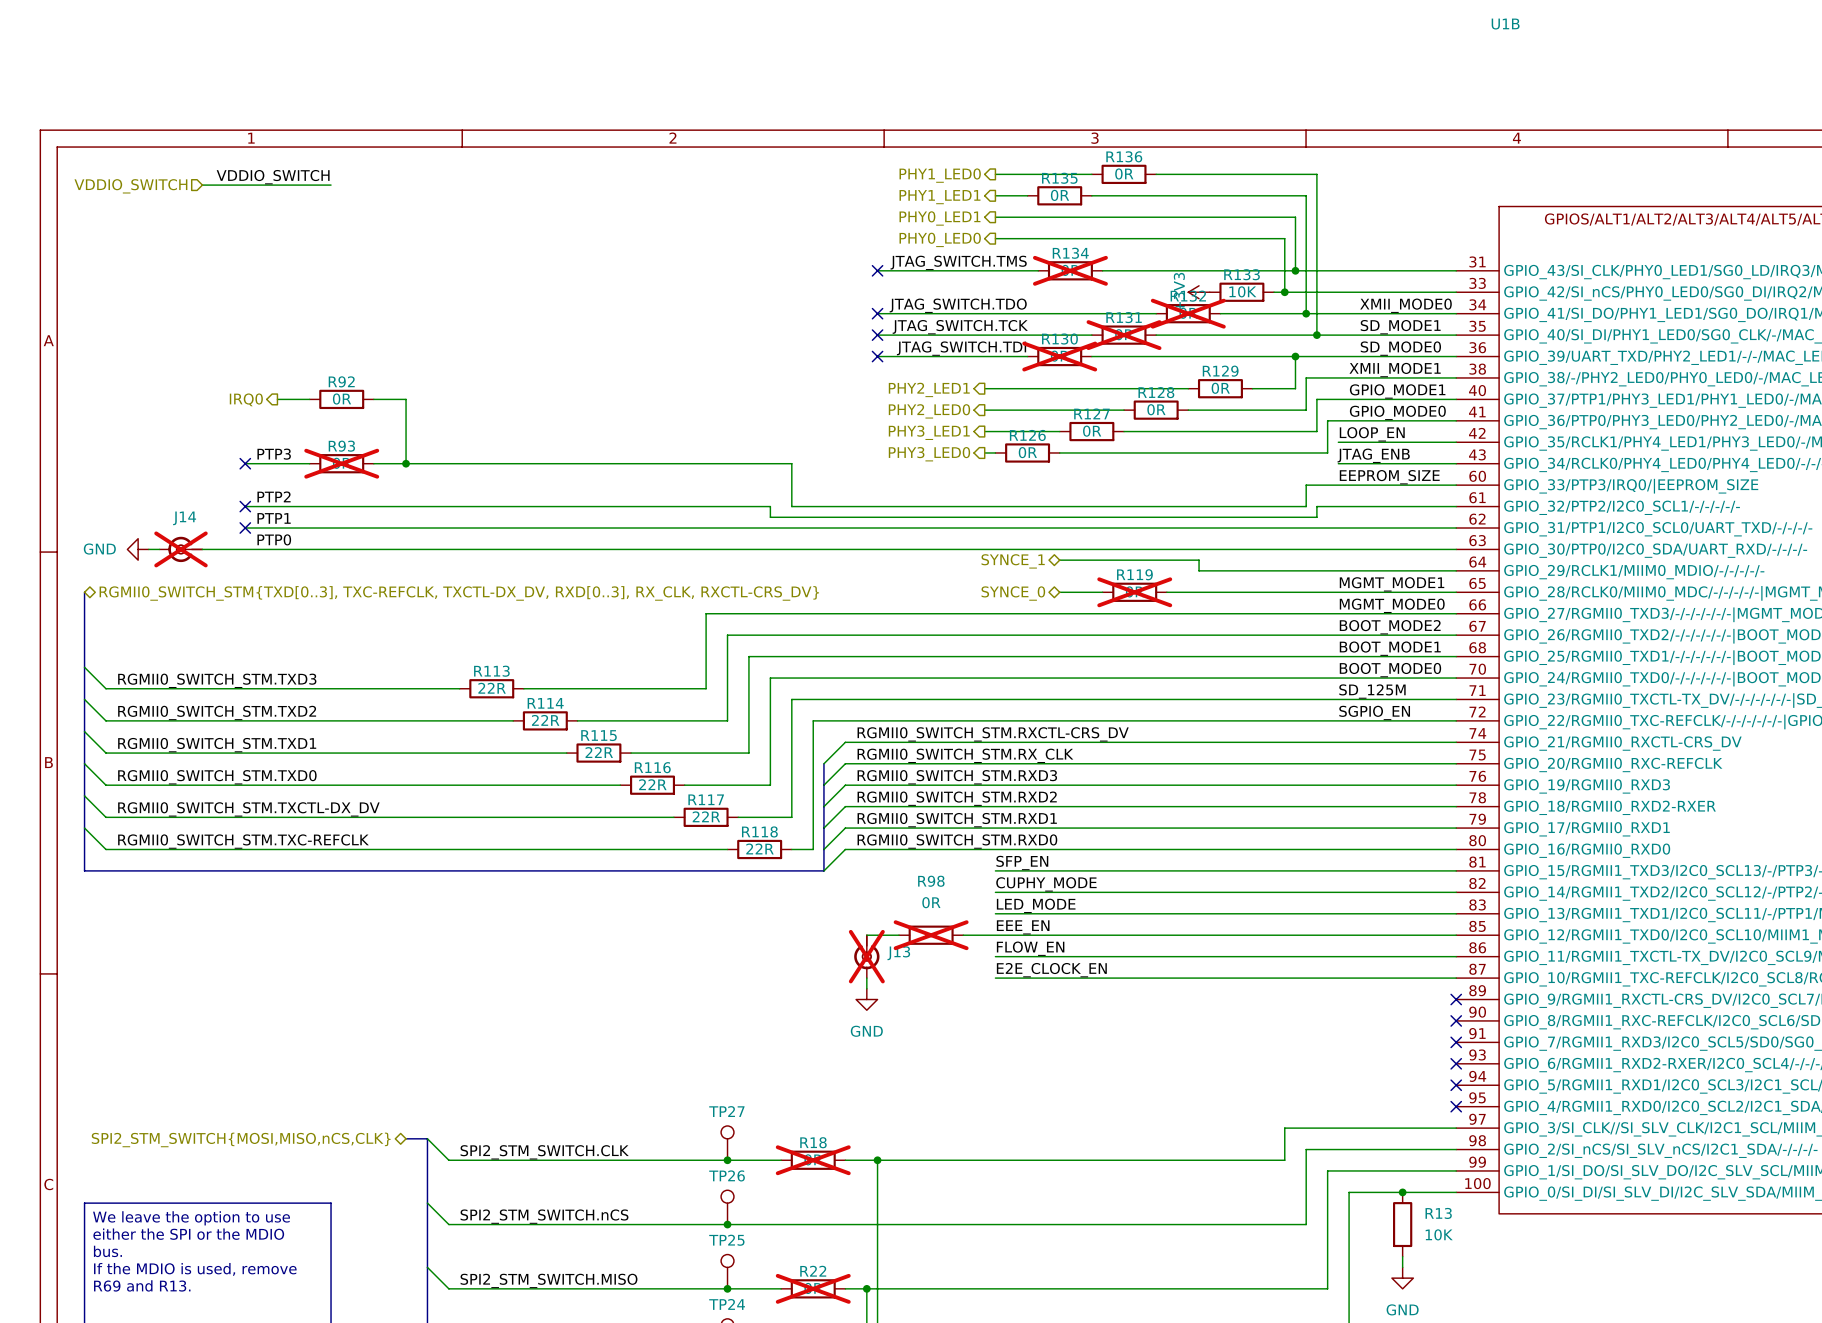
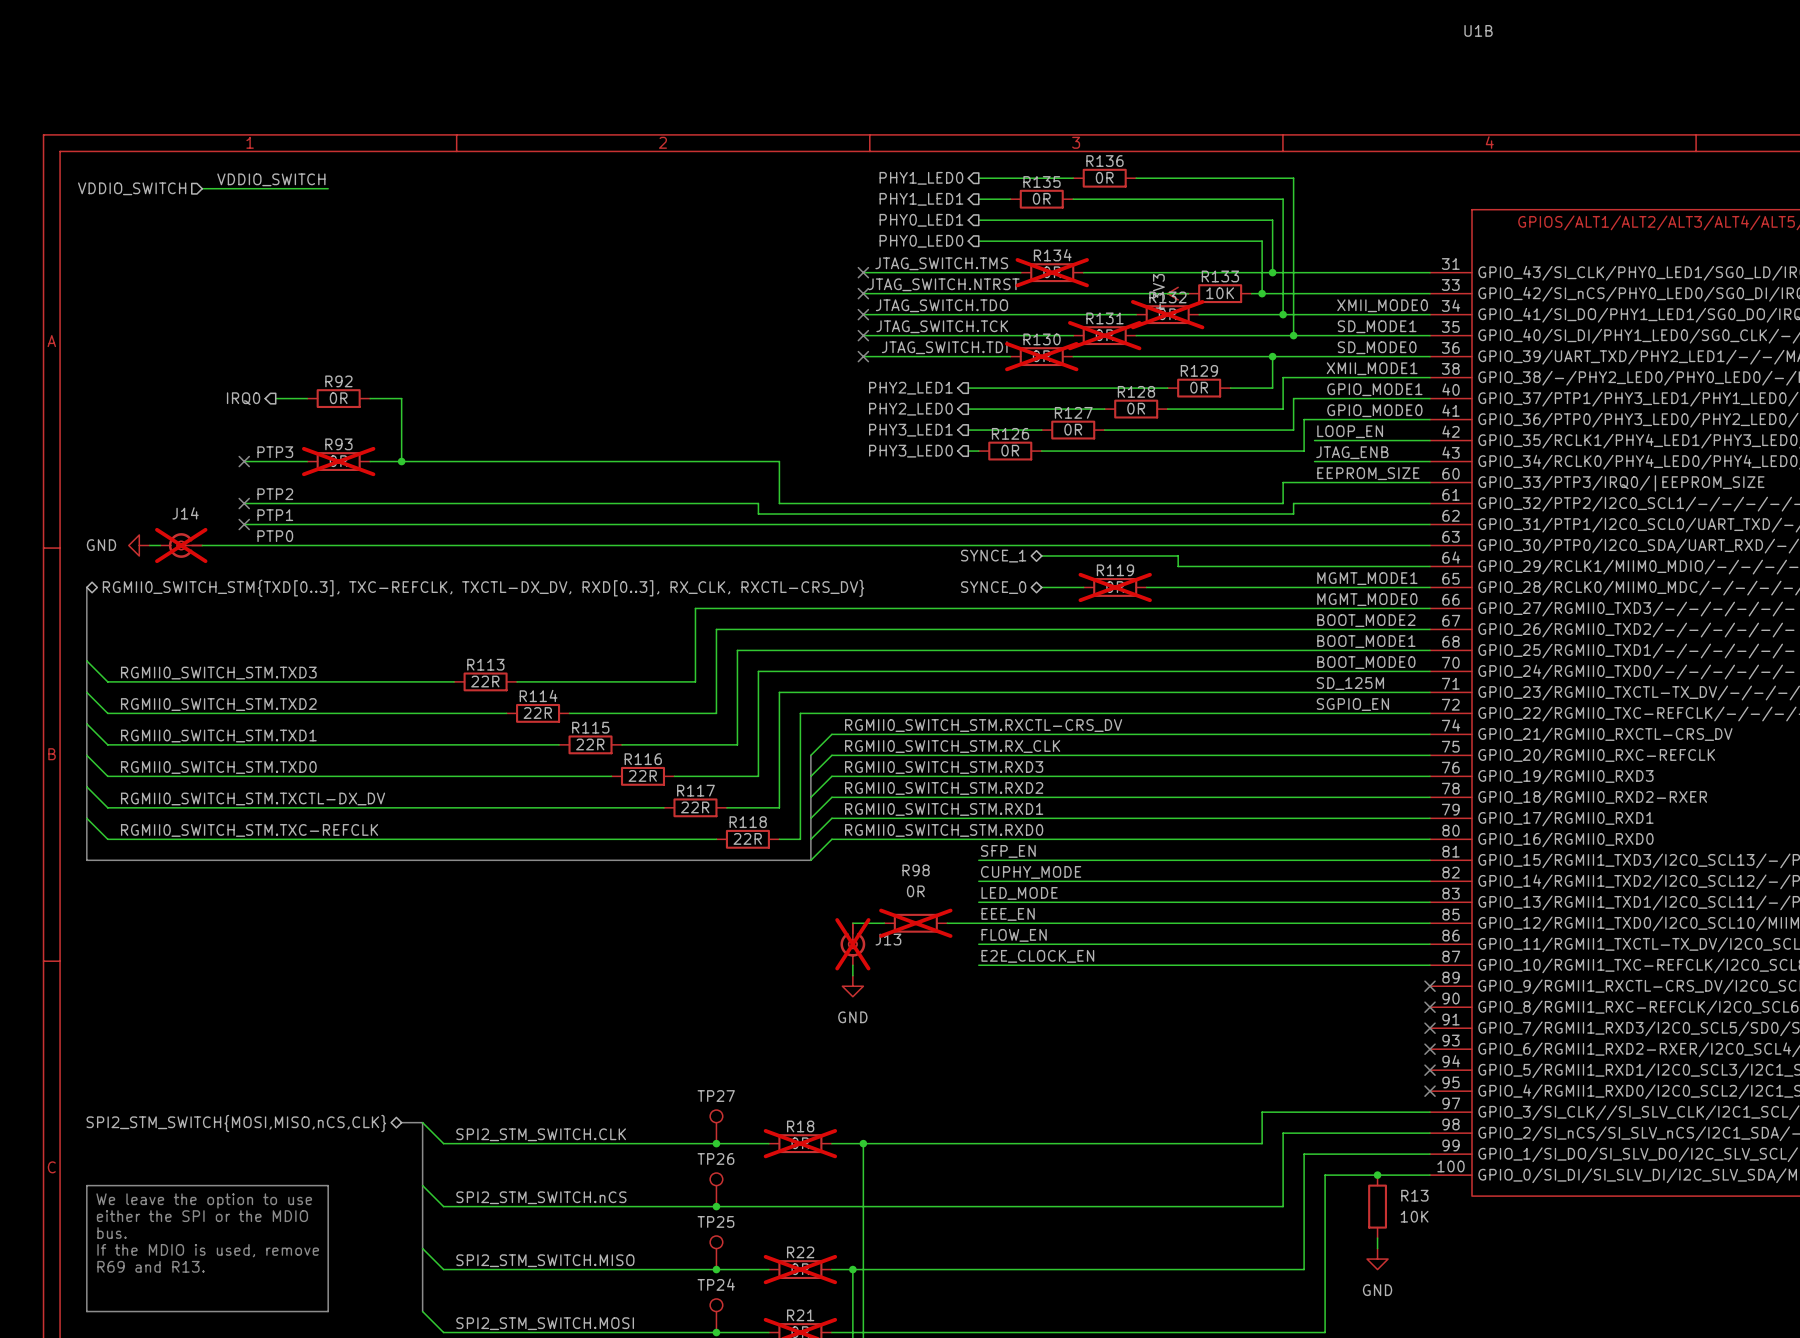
label: none -> JTAG_SWITCH.NTRST (943, 284)
wire: none -> (863, 293) (1188, 293)
no-connect mark: none -> (863, 293)

